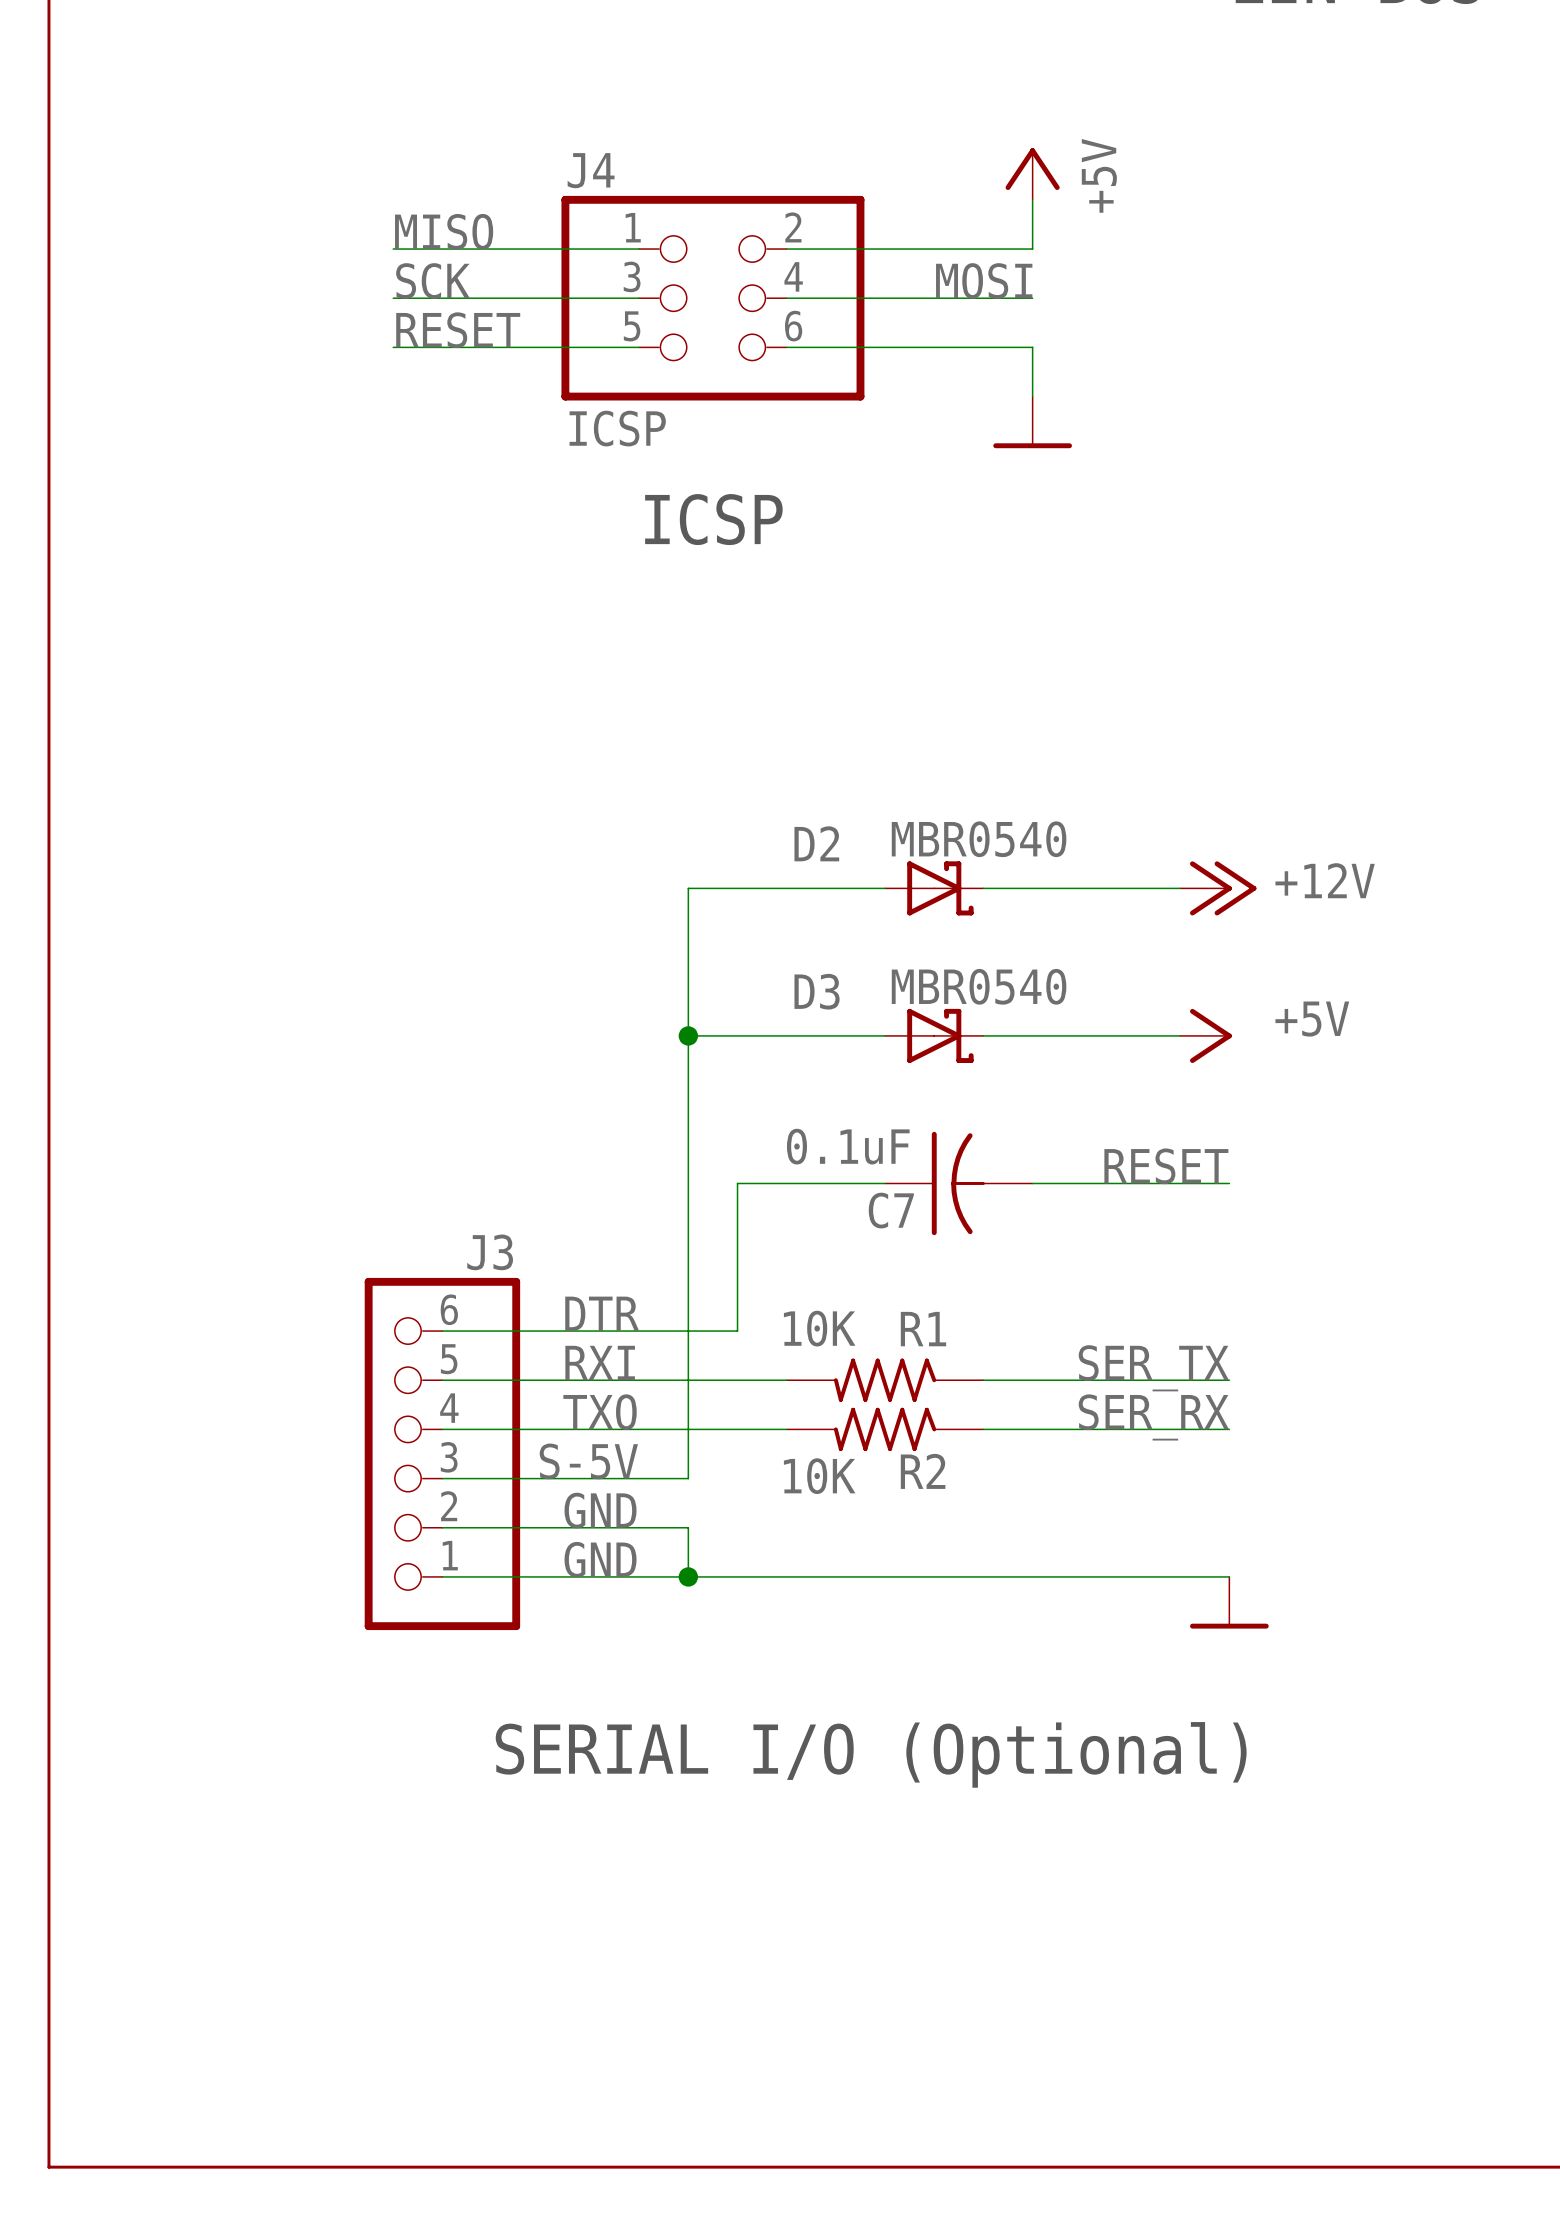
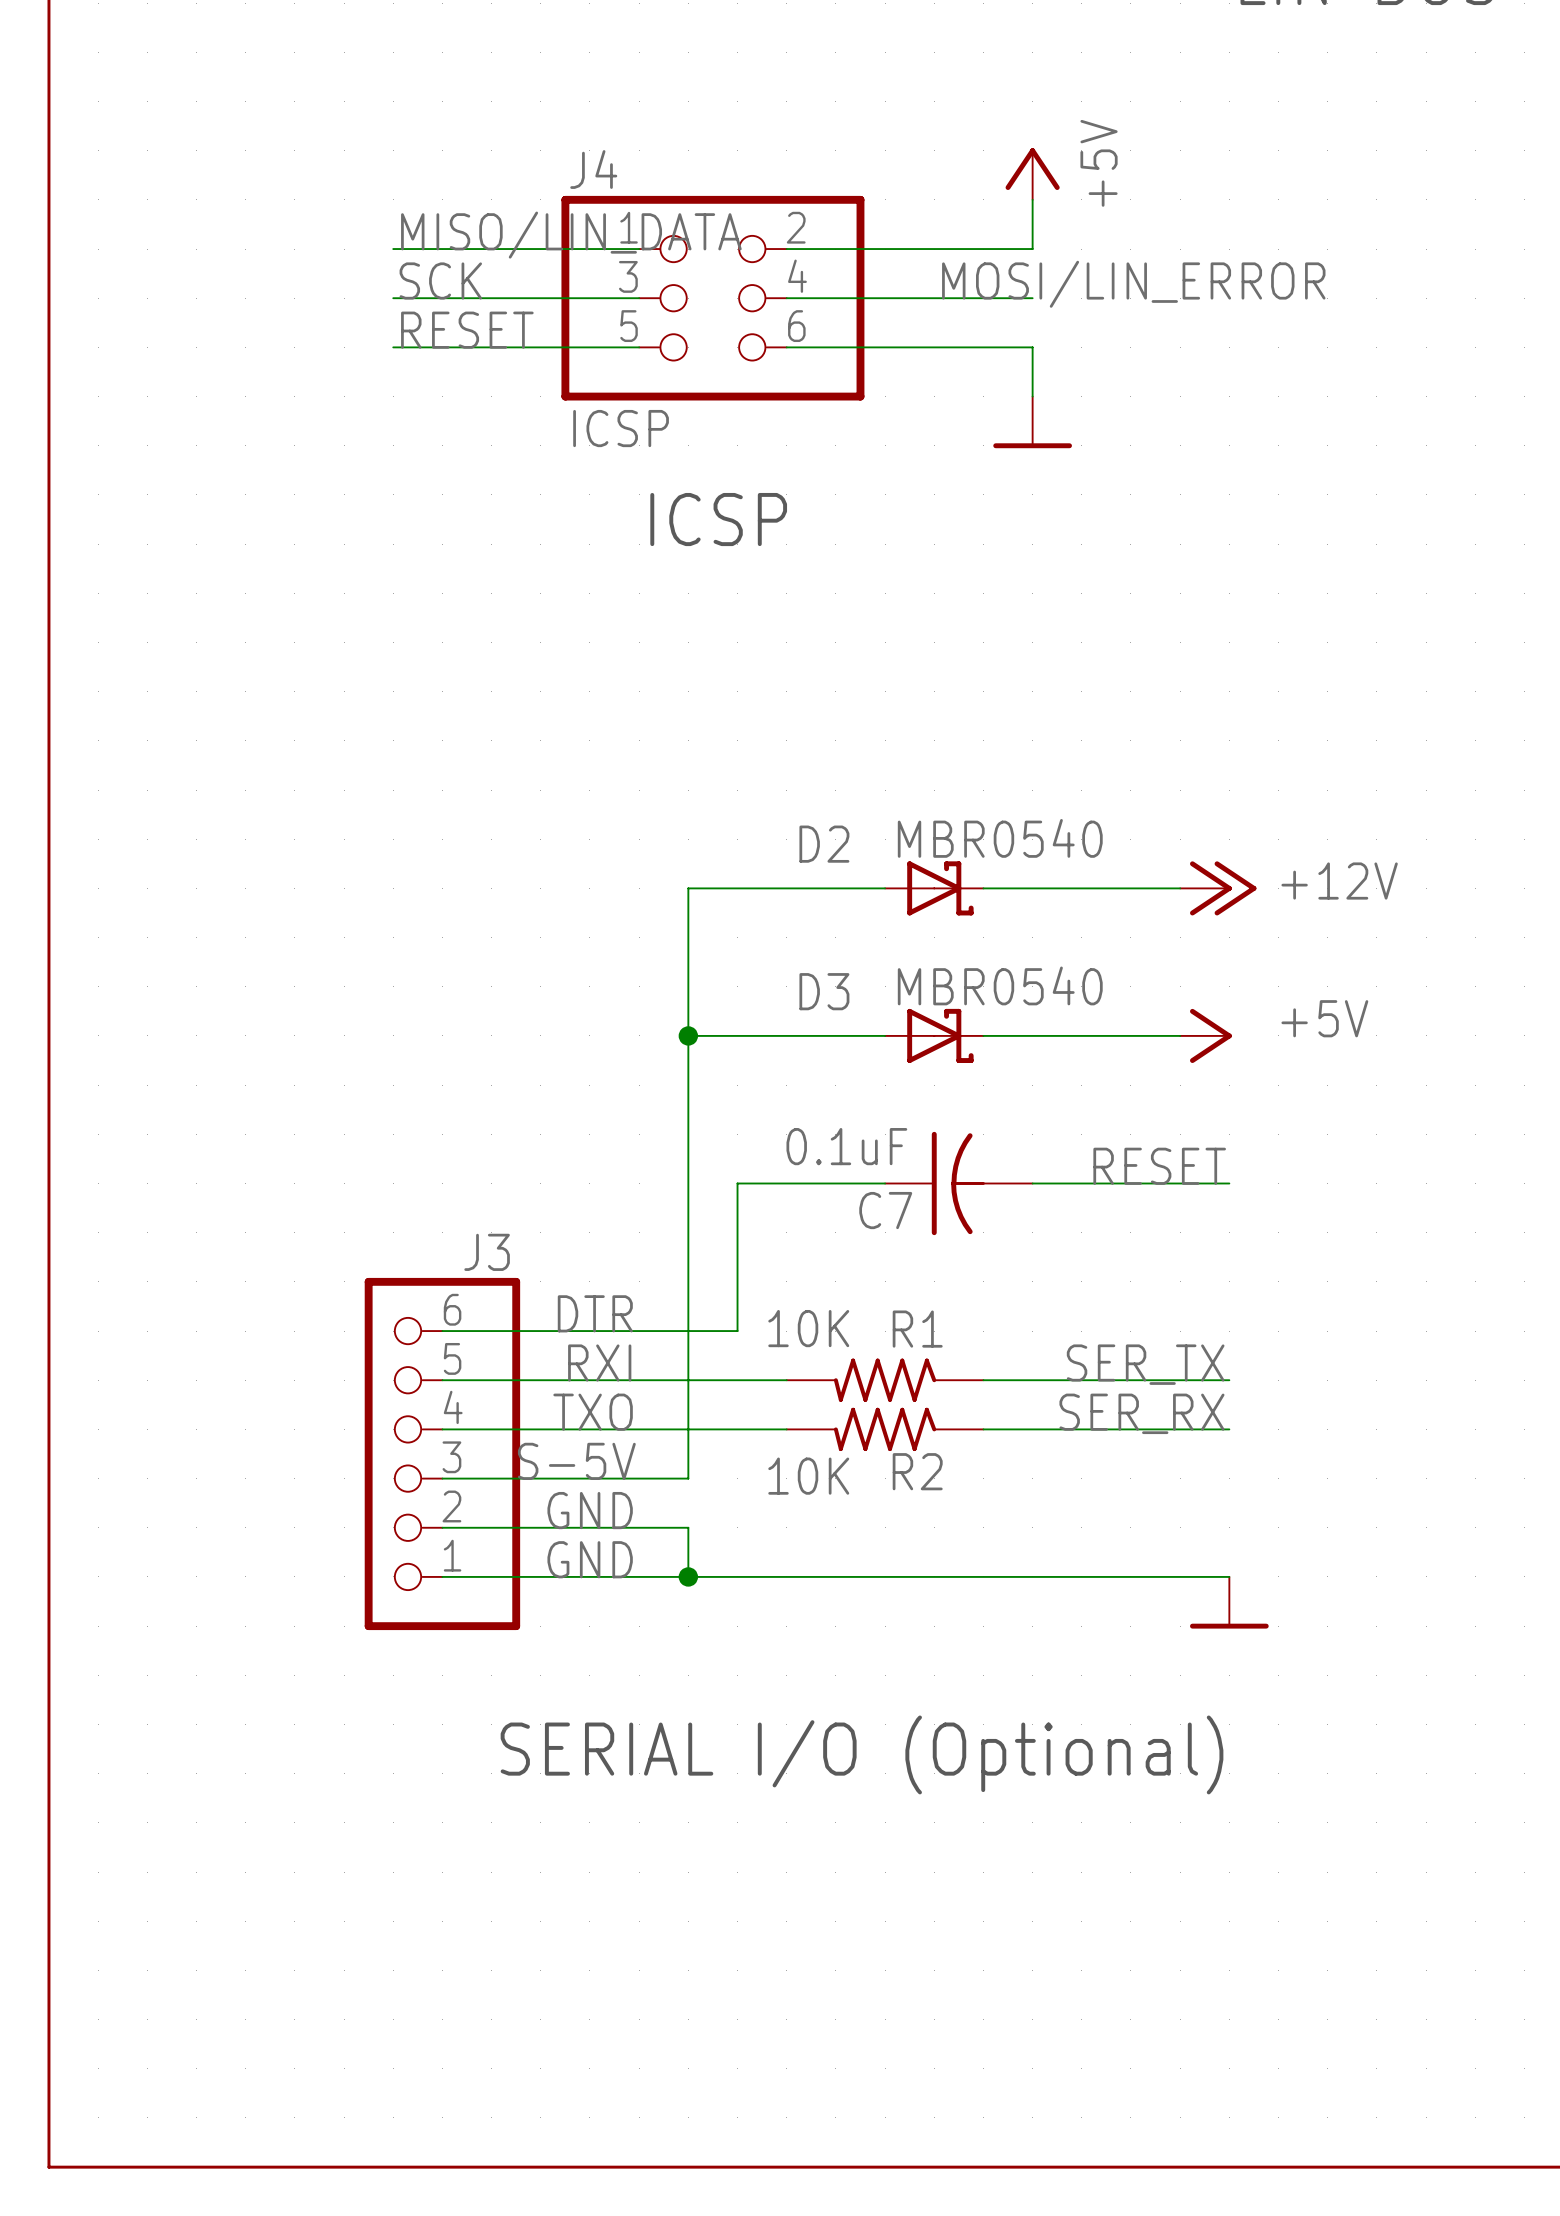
label: MISO (444, 231) -> MISO/LIN_DATA (571, 235)
label: MOSI (984, 281) -> MOSI/LIN_ERROR (1133, 284)

